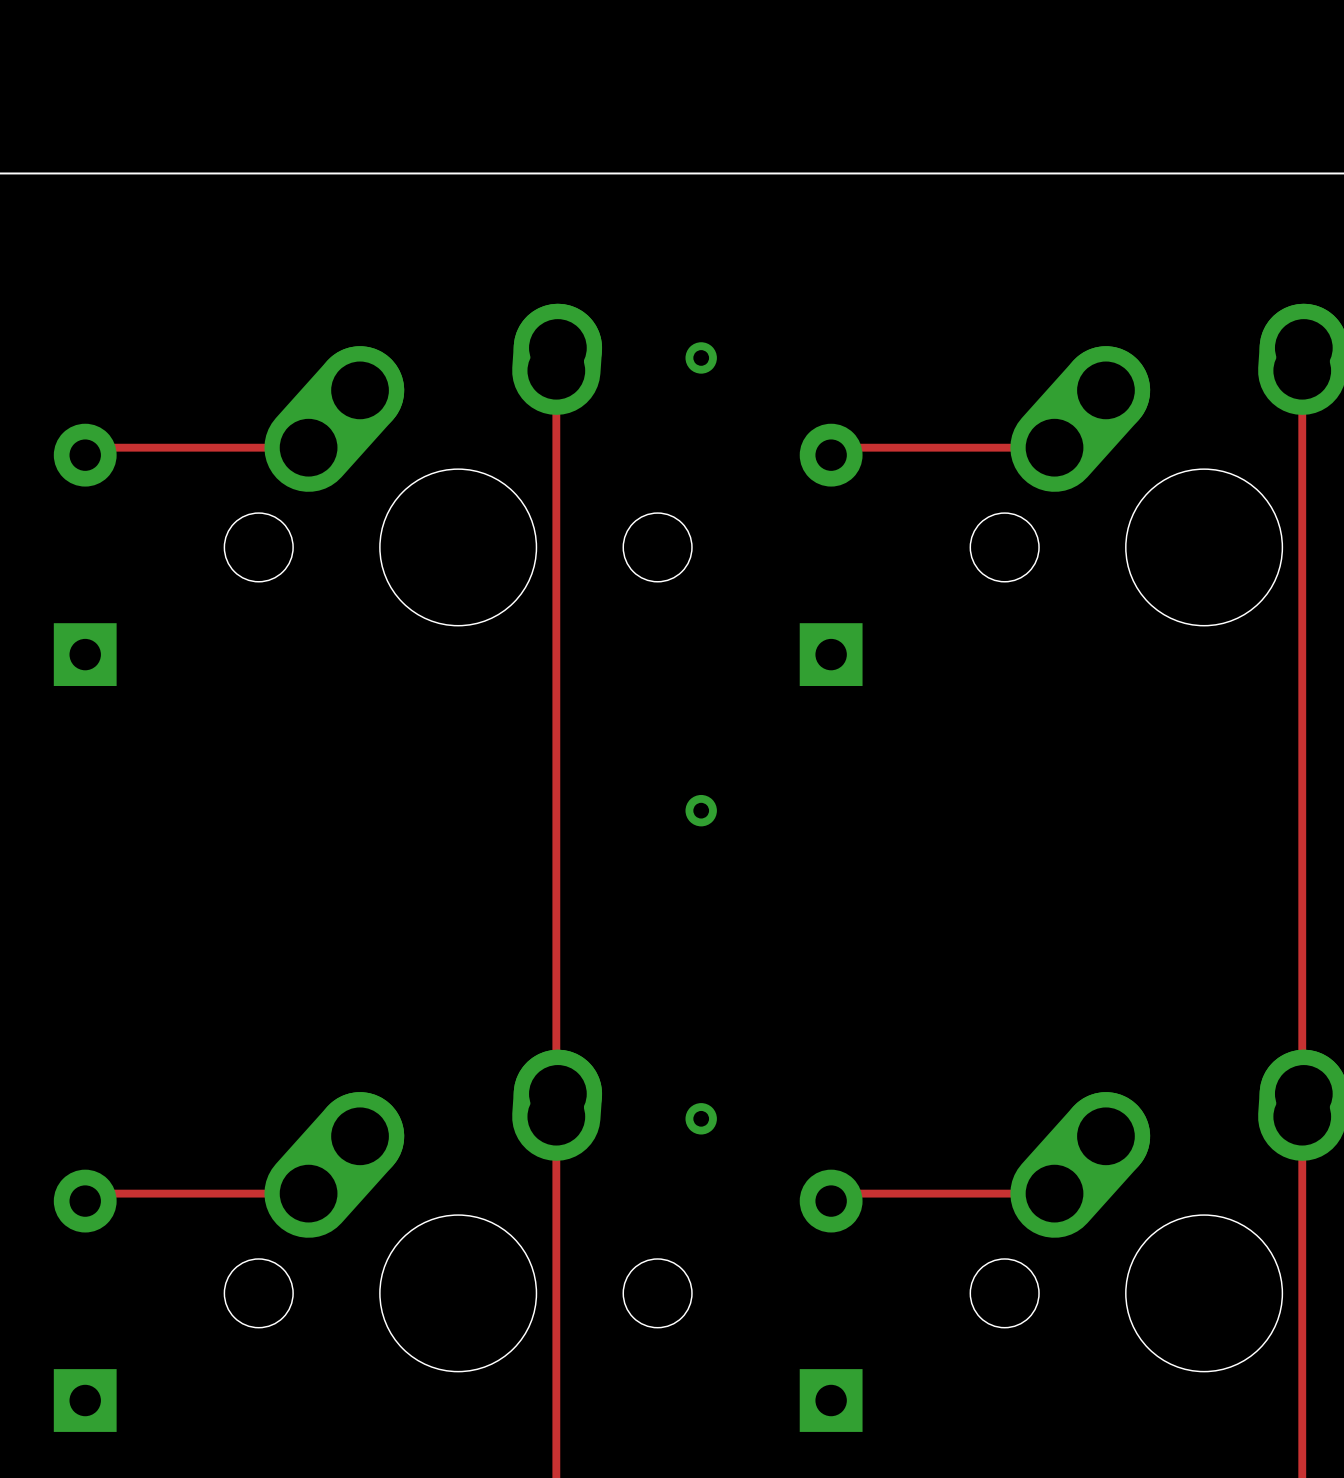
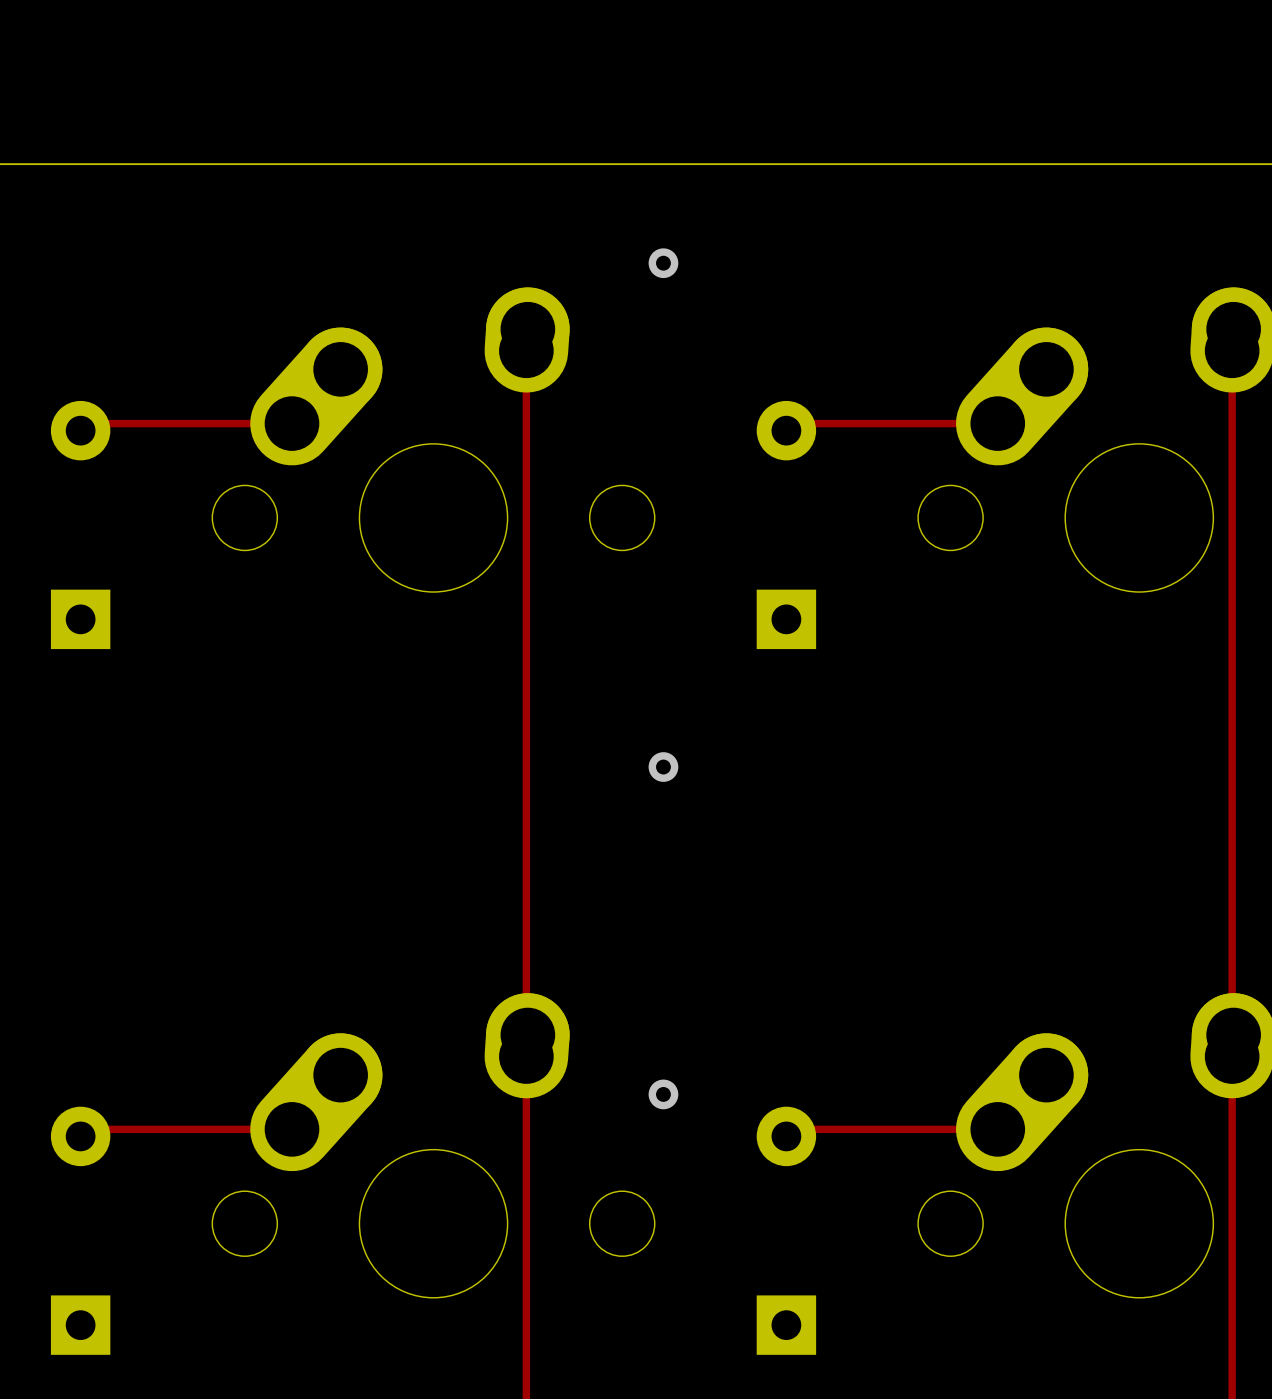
via position: (701, 357) -> (663, 263)
via position: (701, 1118) -> (663, 1094)

